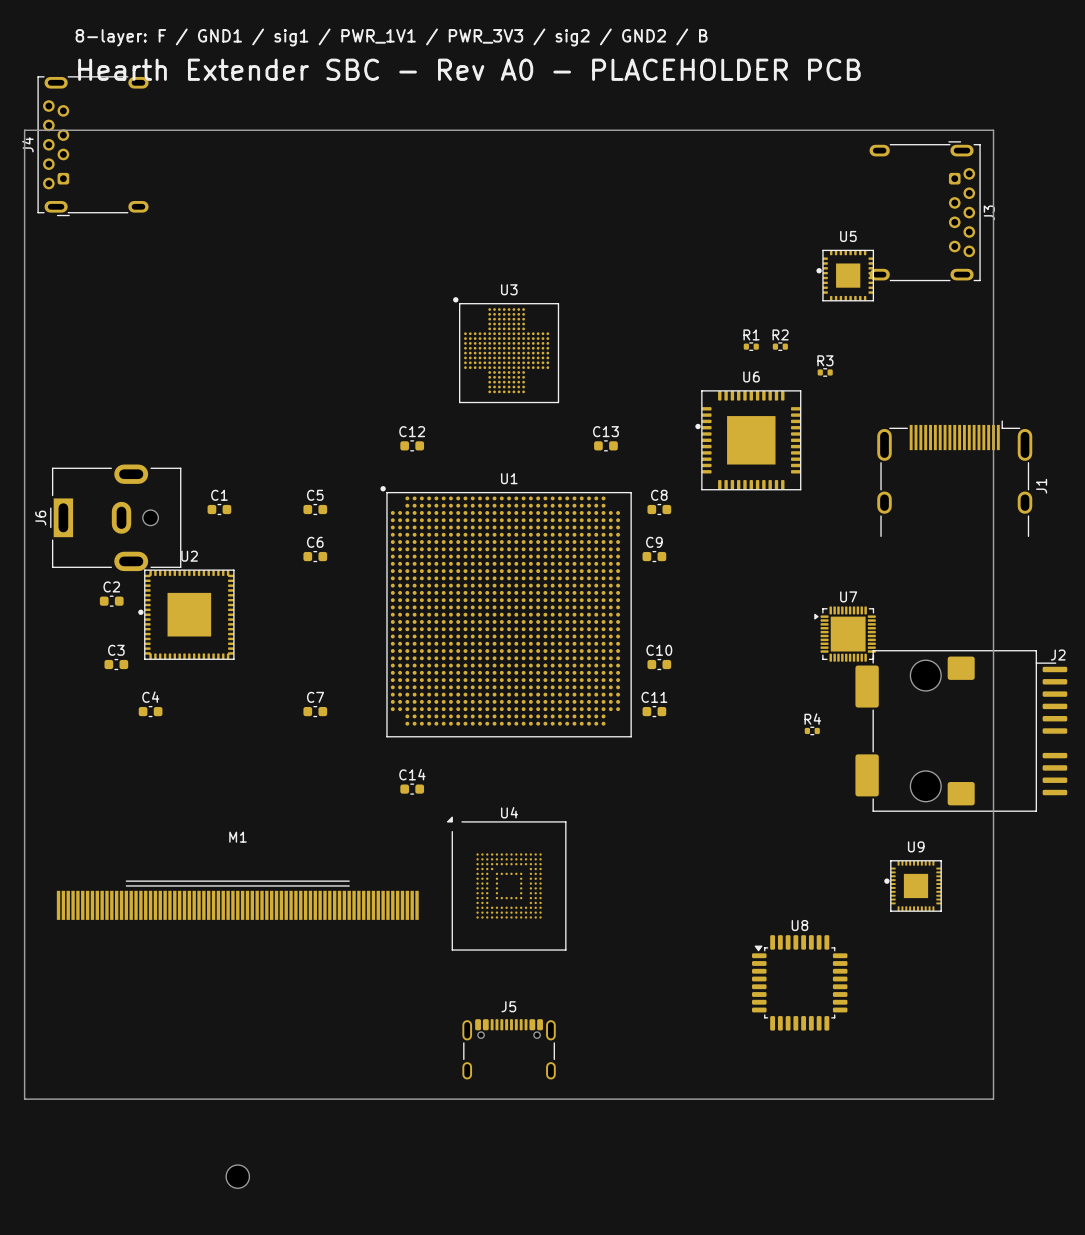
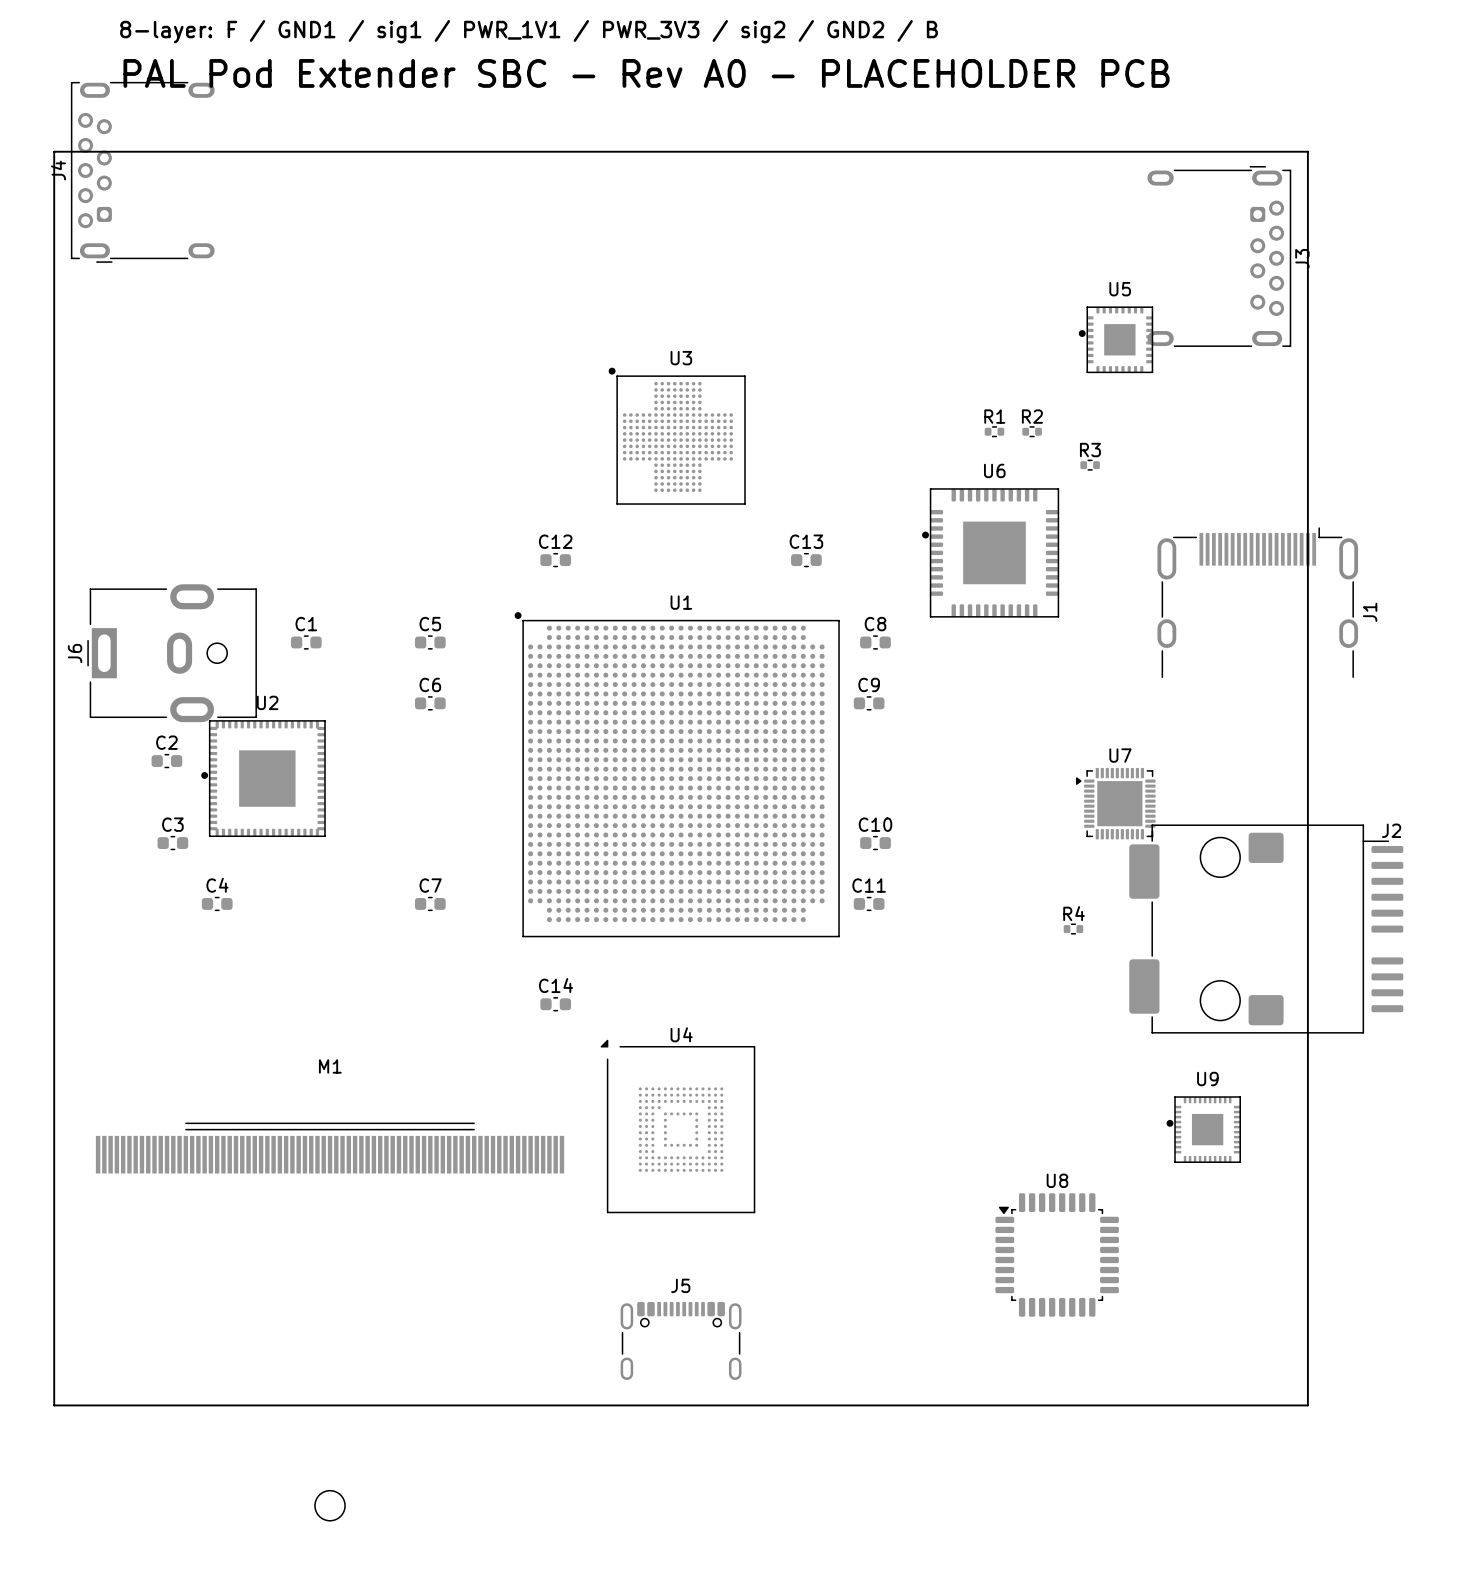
text: Hearth Extender SBC - Rev A0 - PLACEHOLDER PCB (469, 69) -> PAL Pod Extender SBC - Rev A0 - PLACEHOLDER PCB (646, 73)

